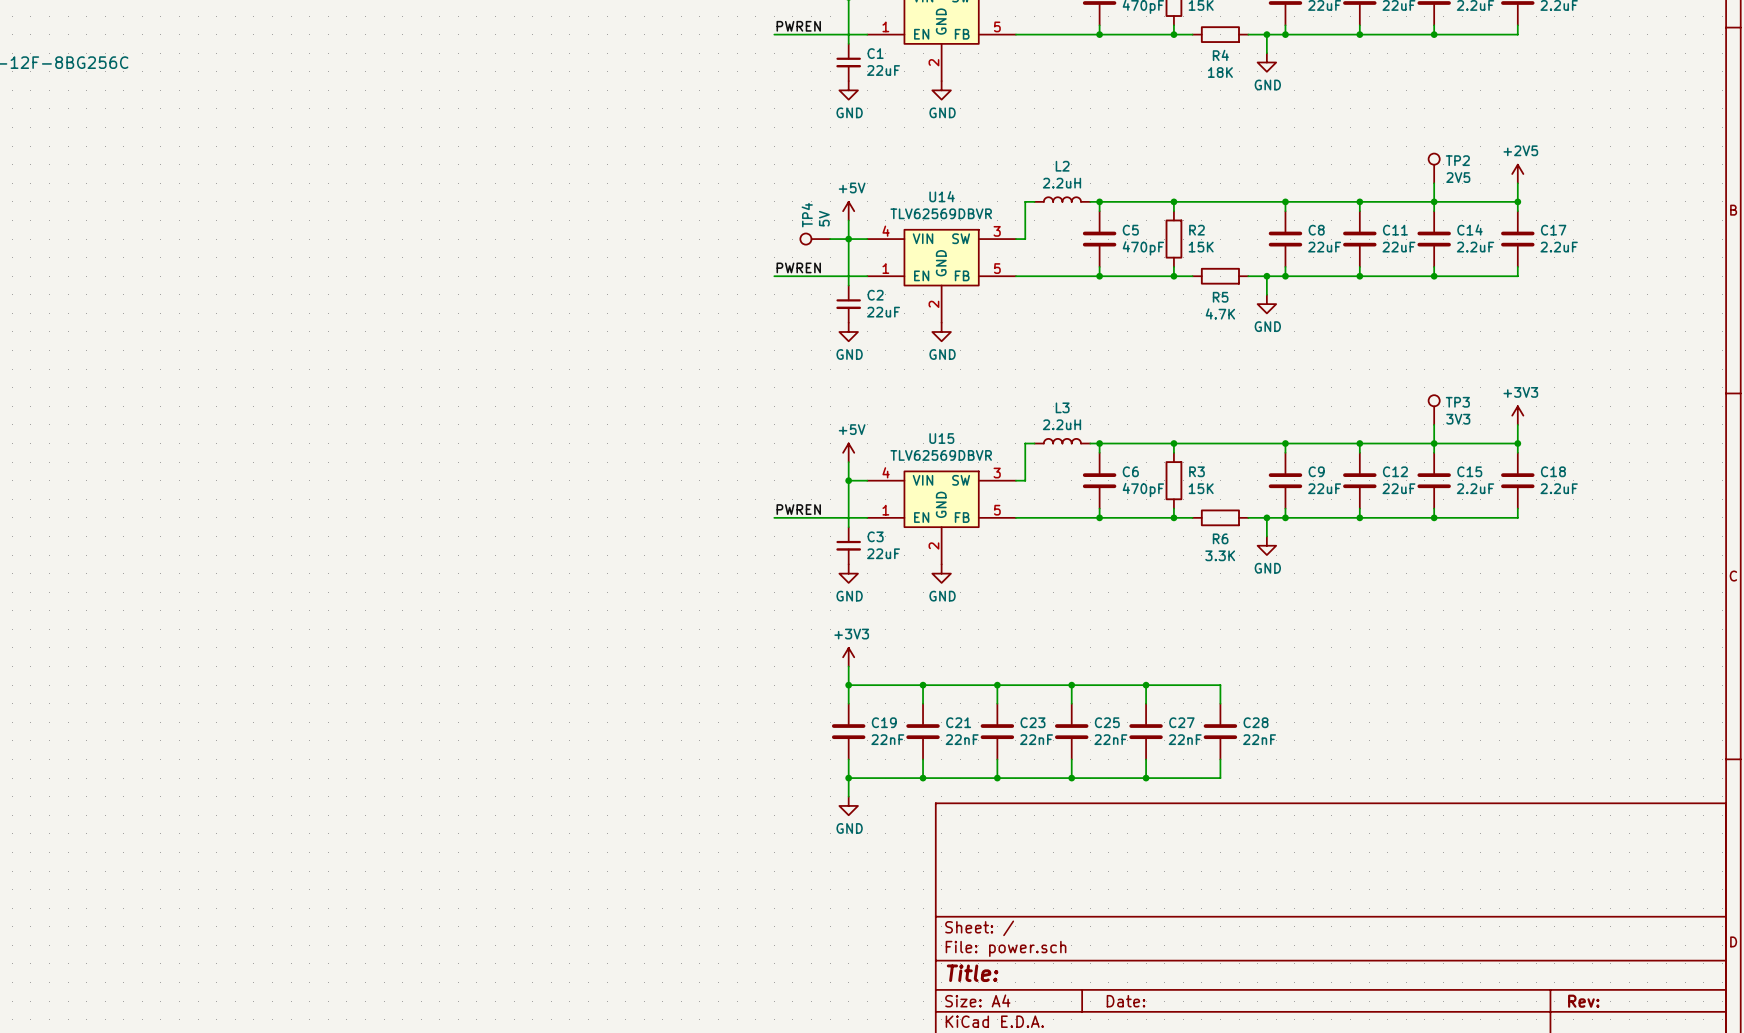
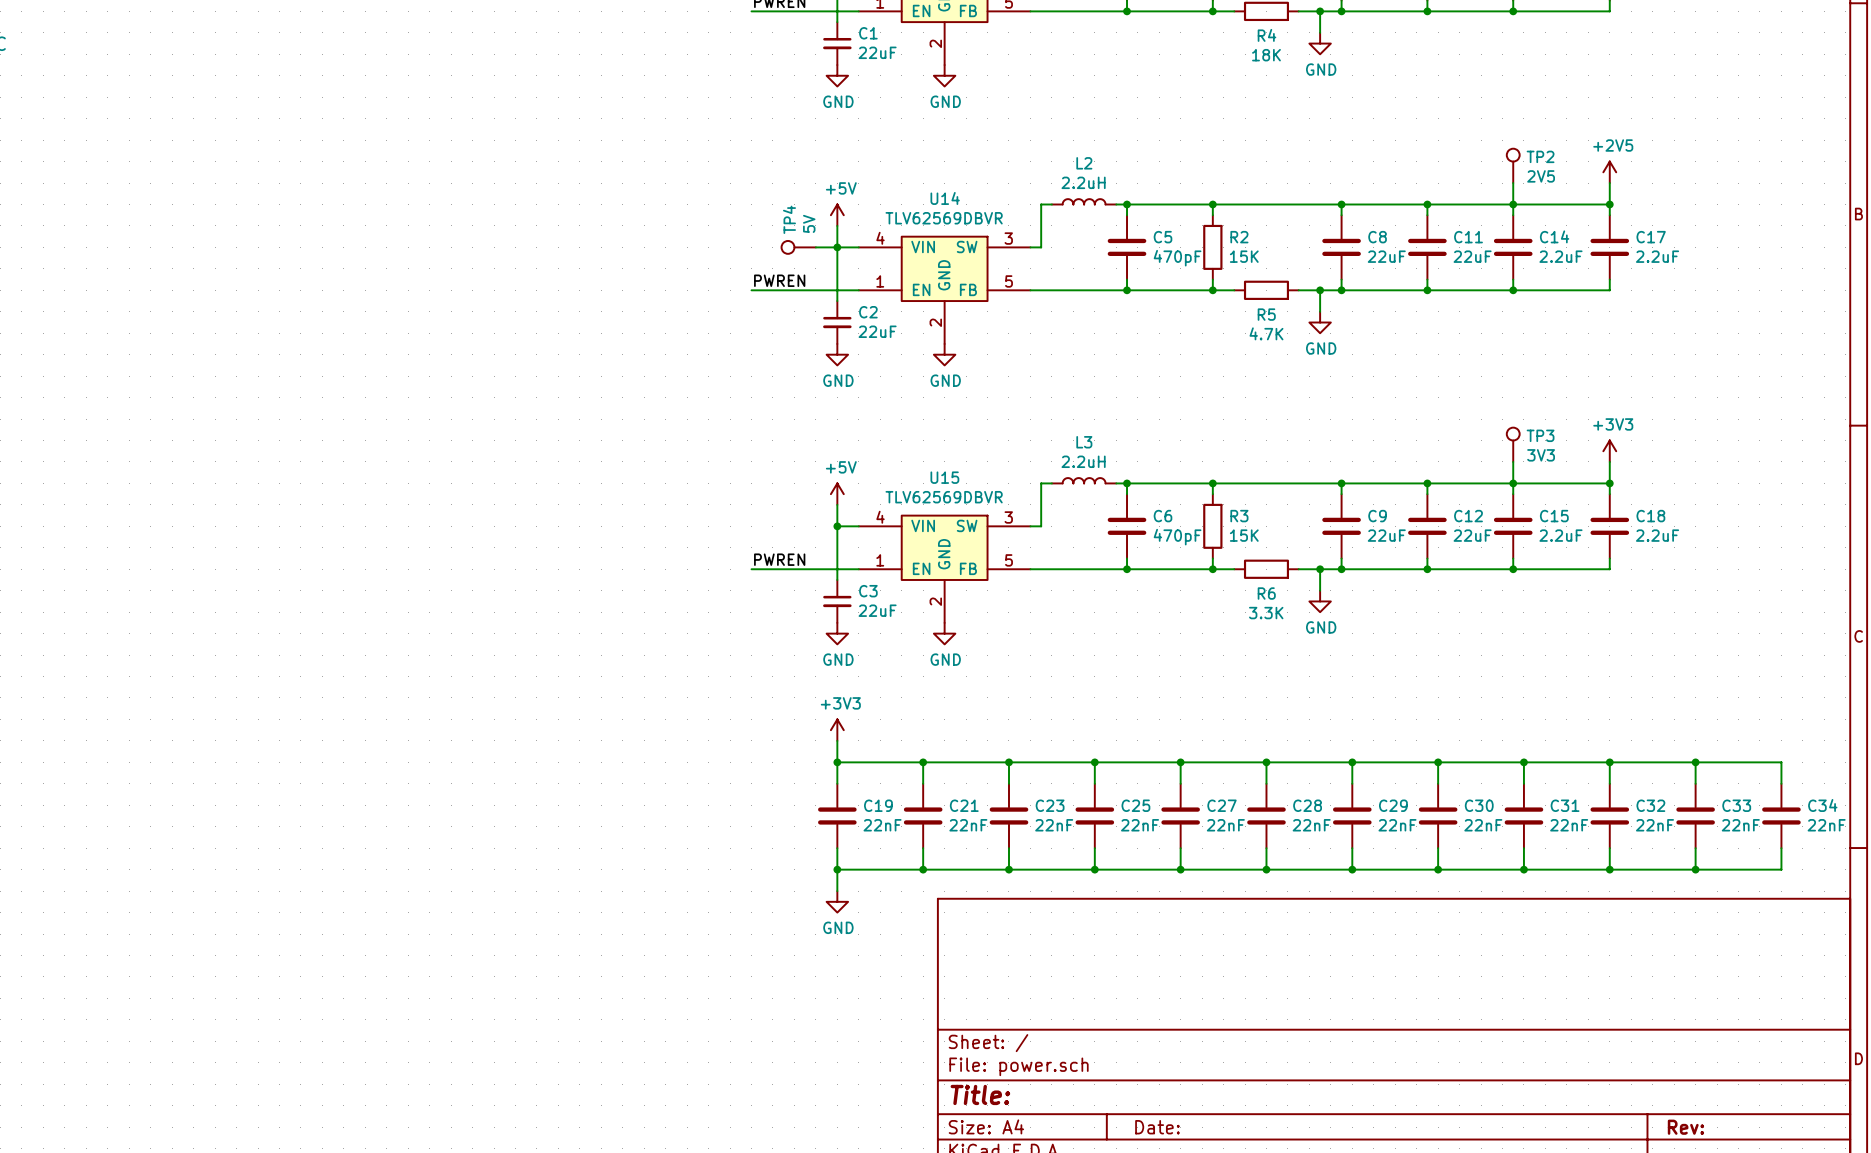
wire: none -> (1266, 762) (1781, 762) (1781, 783)
junction: none -> (1266, 762)
wire: none -> (1352, 762) (1352, 783)
junction: none -> (1352, 762)
wire: none -> (1438, 762) (1438, 783)
junction: none -> (1438, 762)
wire: none -> (1523, 762) (1523, 783)
junction: none -> (1523, 762)
wire: none -> (1609, 762) (1609, 783)
junction: none -> (1609, 762)
wire: none -> (1695, 762) (1695, 783)
junction: none -> (1695, 762)
C29: none -> 22nF (1352, 816)
C30: none -> 22nF (1438, 816)
C31: none -> 22nF (1523, 816)
C32: none -> 22nF (1609, 816)
C33: none -> 22nF (1695, 816)
C34: none -> 22nF (1781, 816)
wire: none -> (1352, 848) (1352, 869)
wire: none -> (1438, 848) (1438, 869)
wire: none -> (1523, 848) (1523, 869)
wire: none -> (1609, 848) (1609, 869)
wire: none -> (1695, 848) (1695, 869)
wire: none -> (1781, 848) (1781, 869) (1266, 869)
junction: none -> (1266, 869)
junction: none -> (1352, 869)
junction: none -> (1438, 869)
junction: none -> (1523, 869)
junction: none -> (1609, 869)
junction: none -> (1695, 869)

